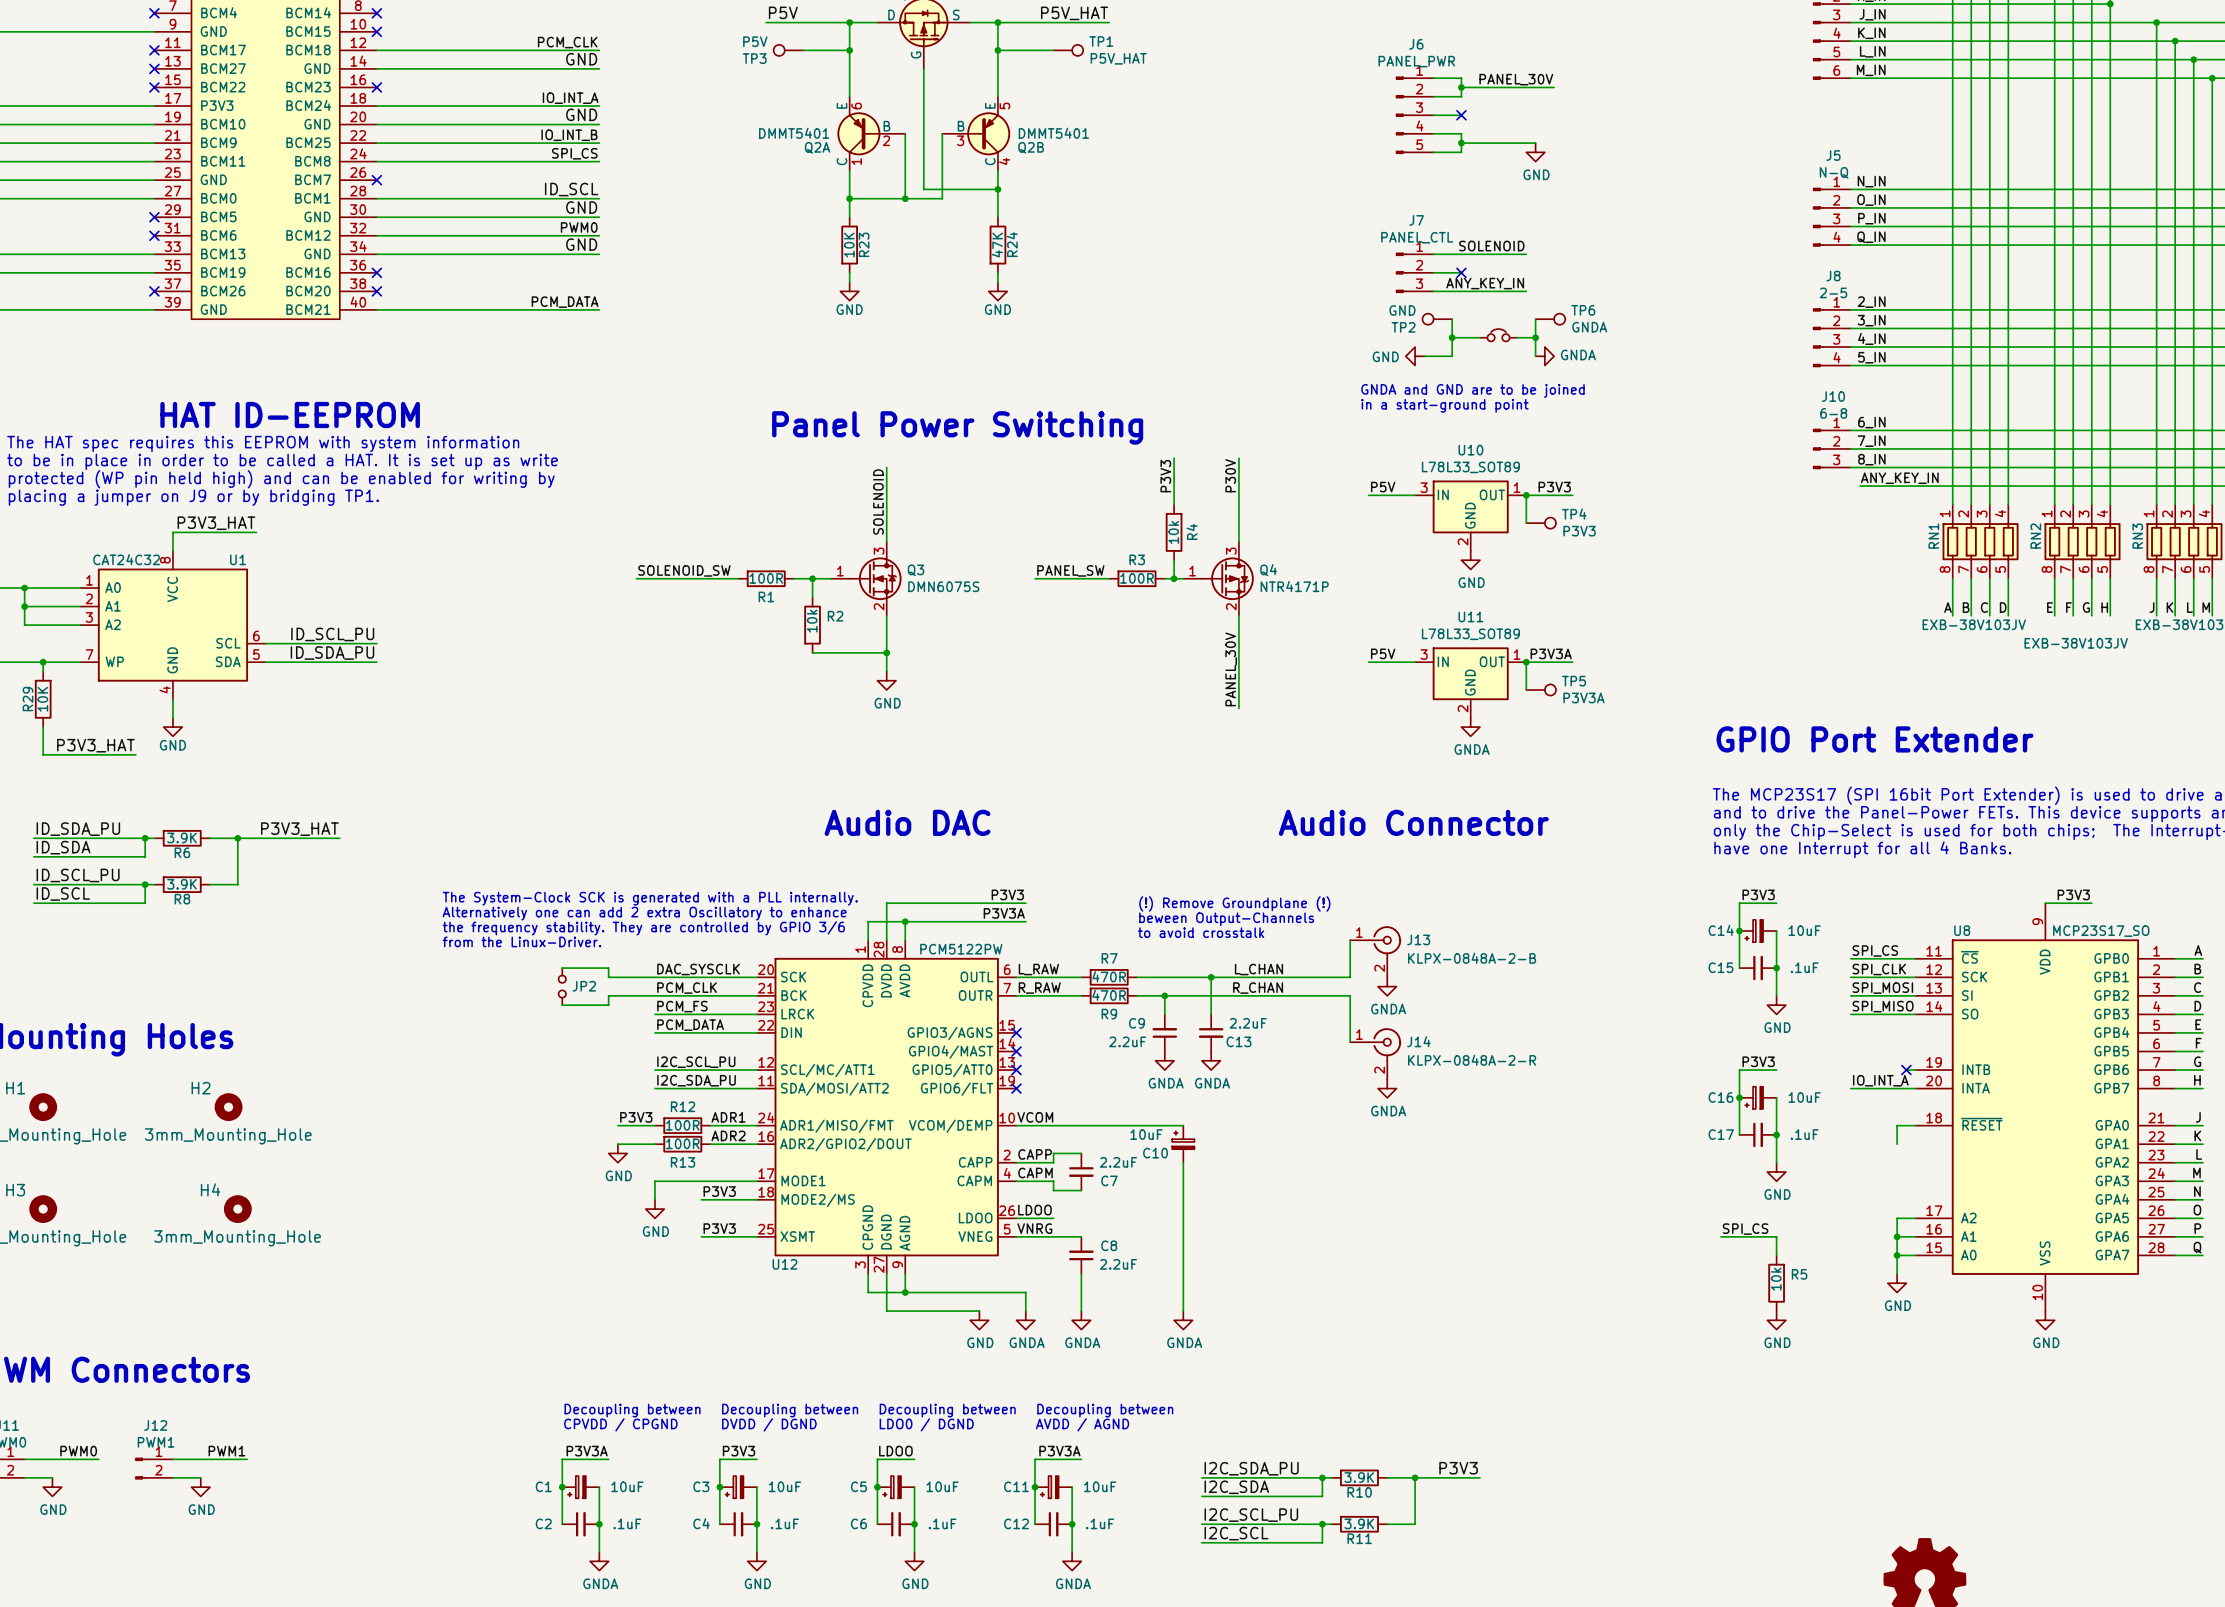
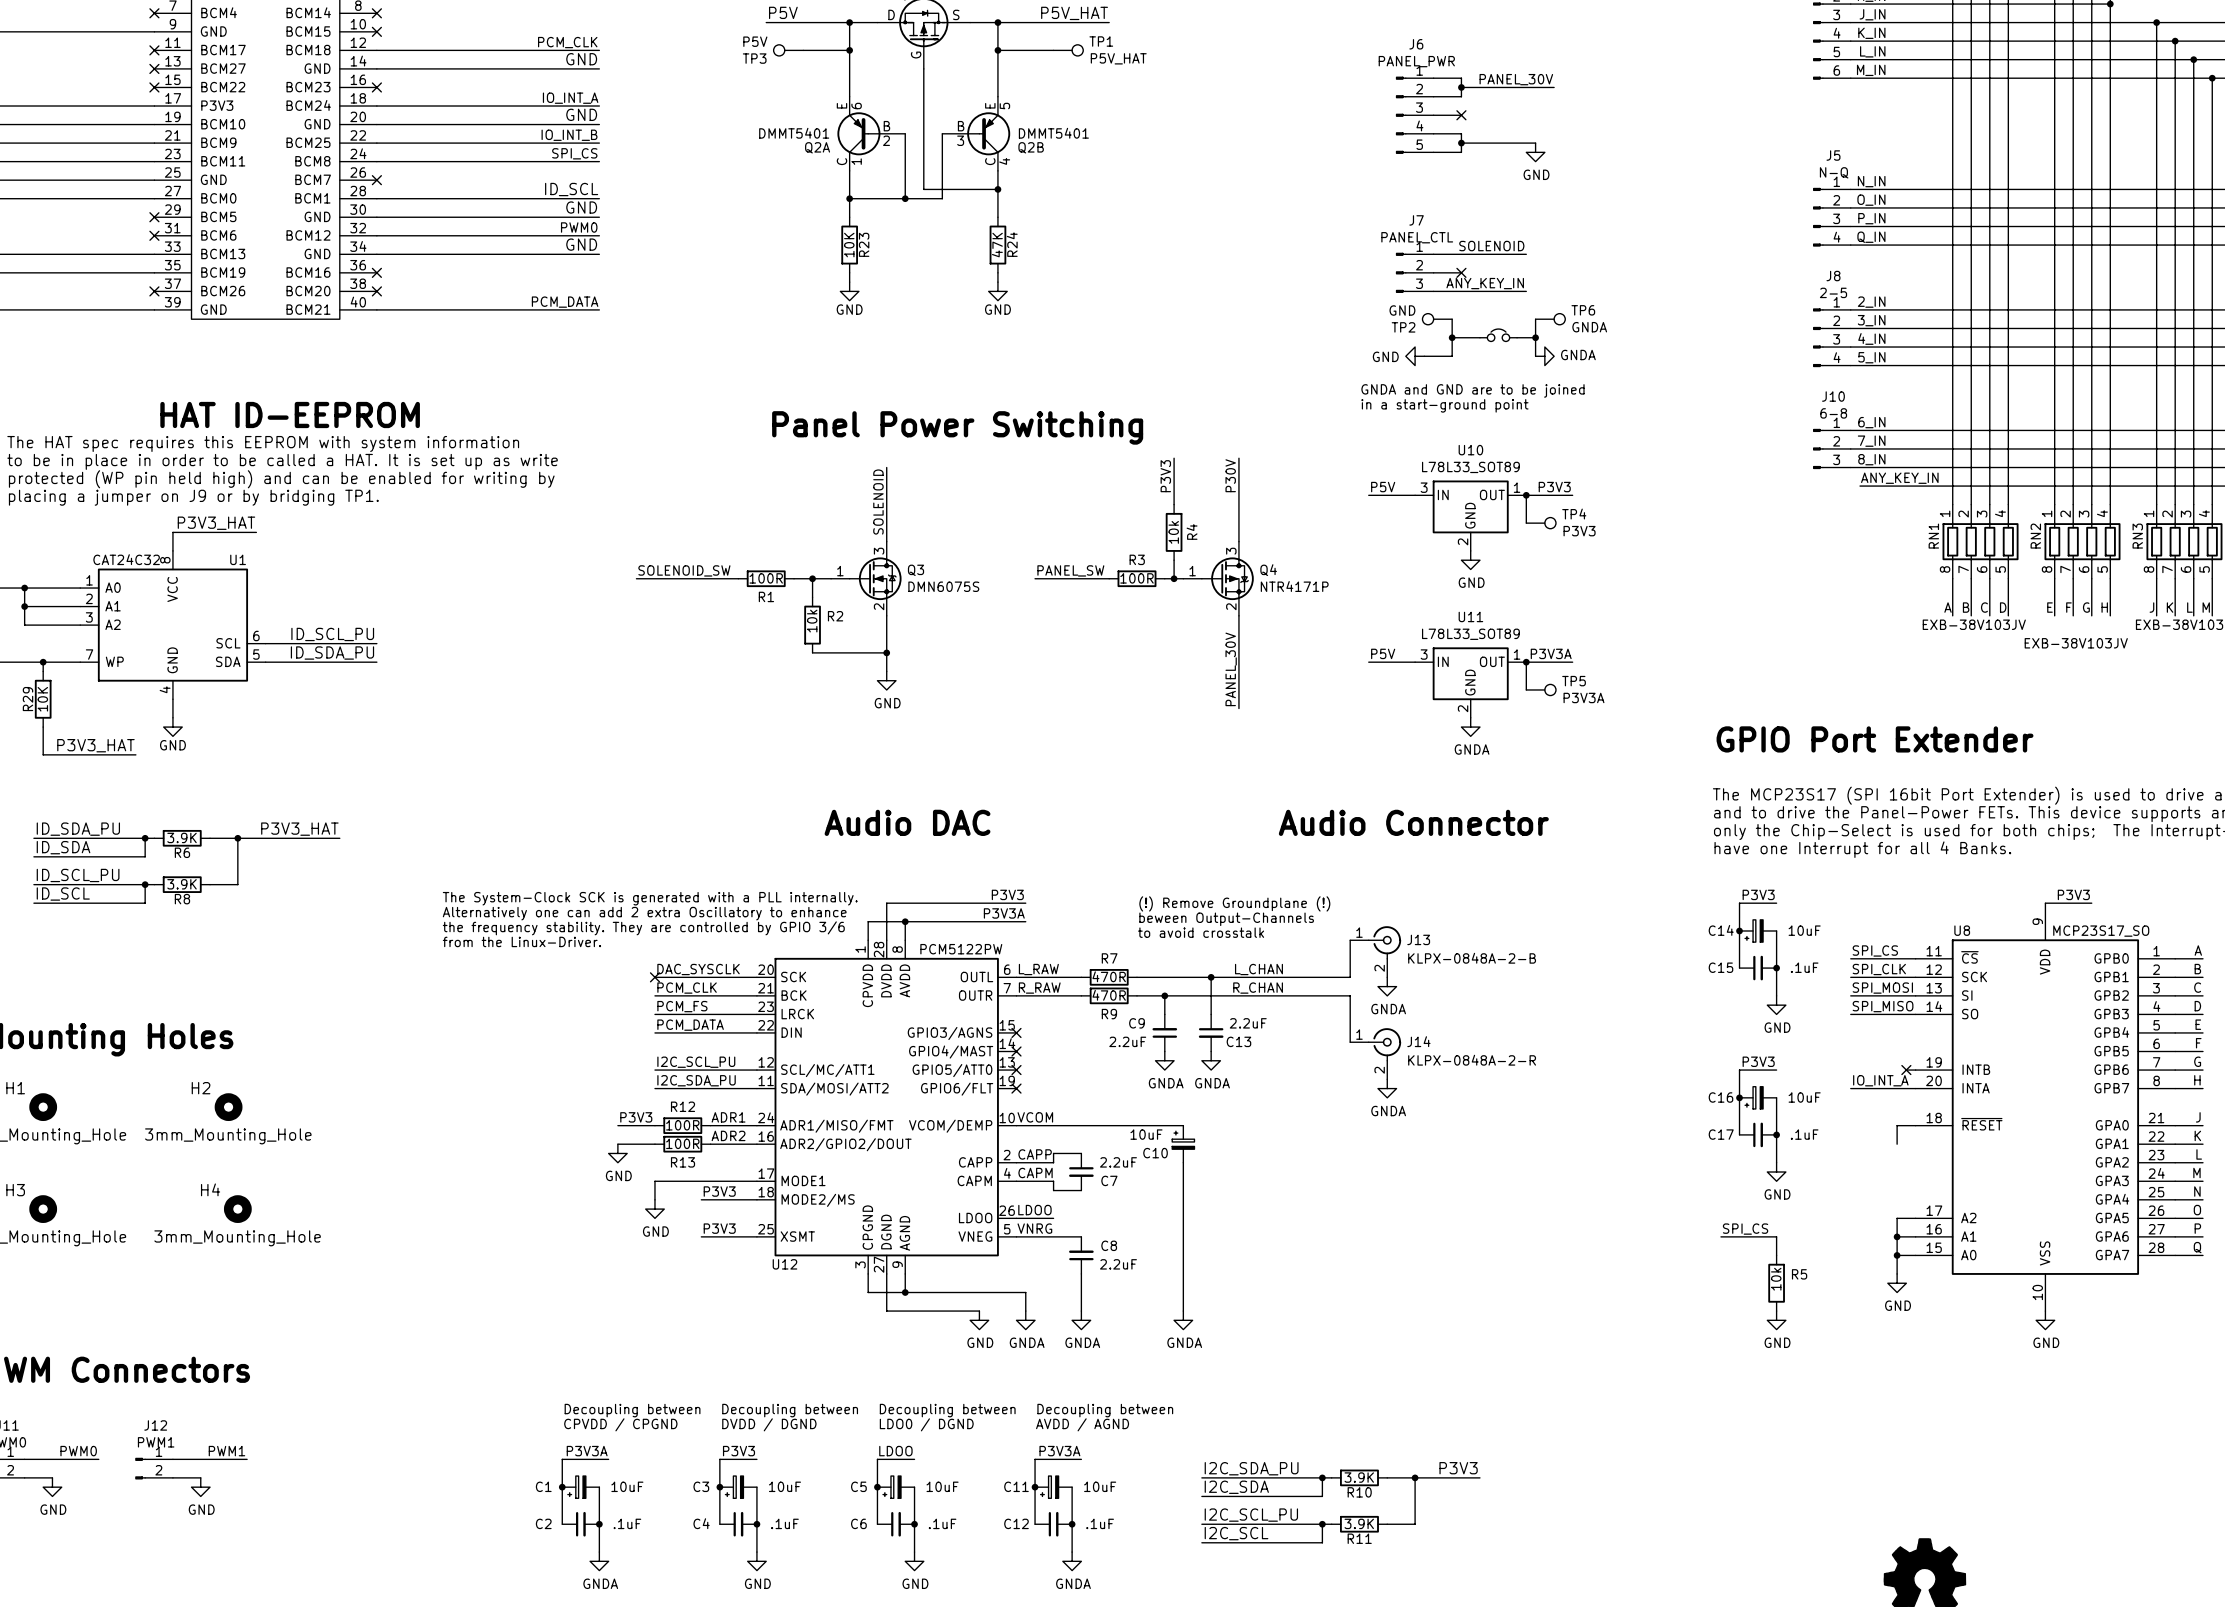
wire: (562, 968) (608, 968) (608, 977) (654, 977) -> none
no-connect mark: none -> (654, 977)
JP2: (562, 986) -> none
wire: (654, 995) (608, 995) (608, 1005) (562, 1005) -> none

